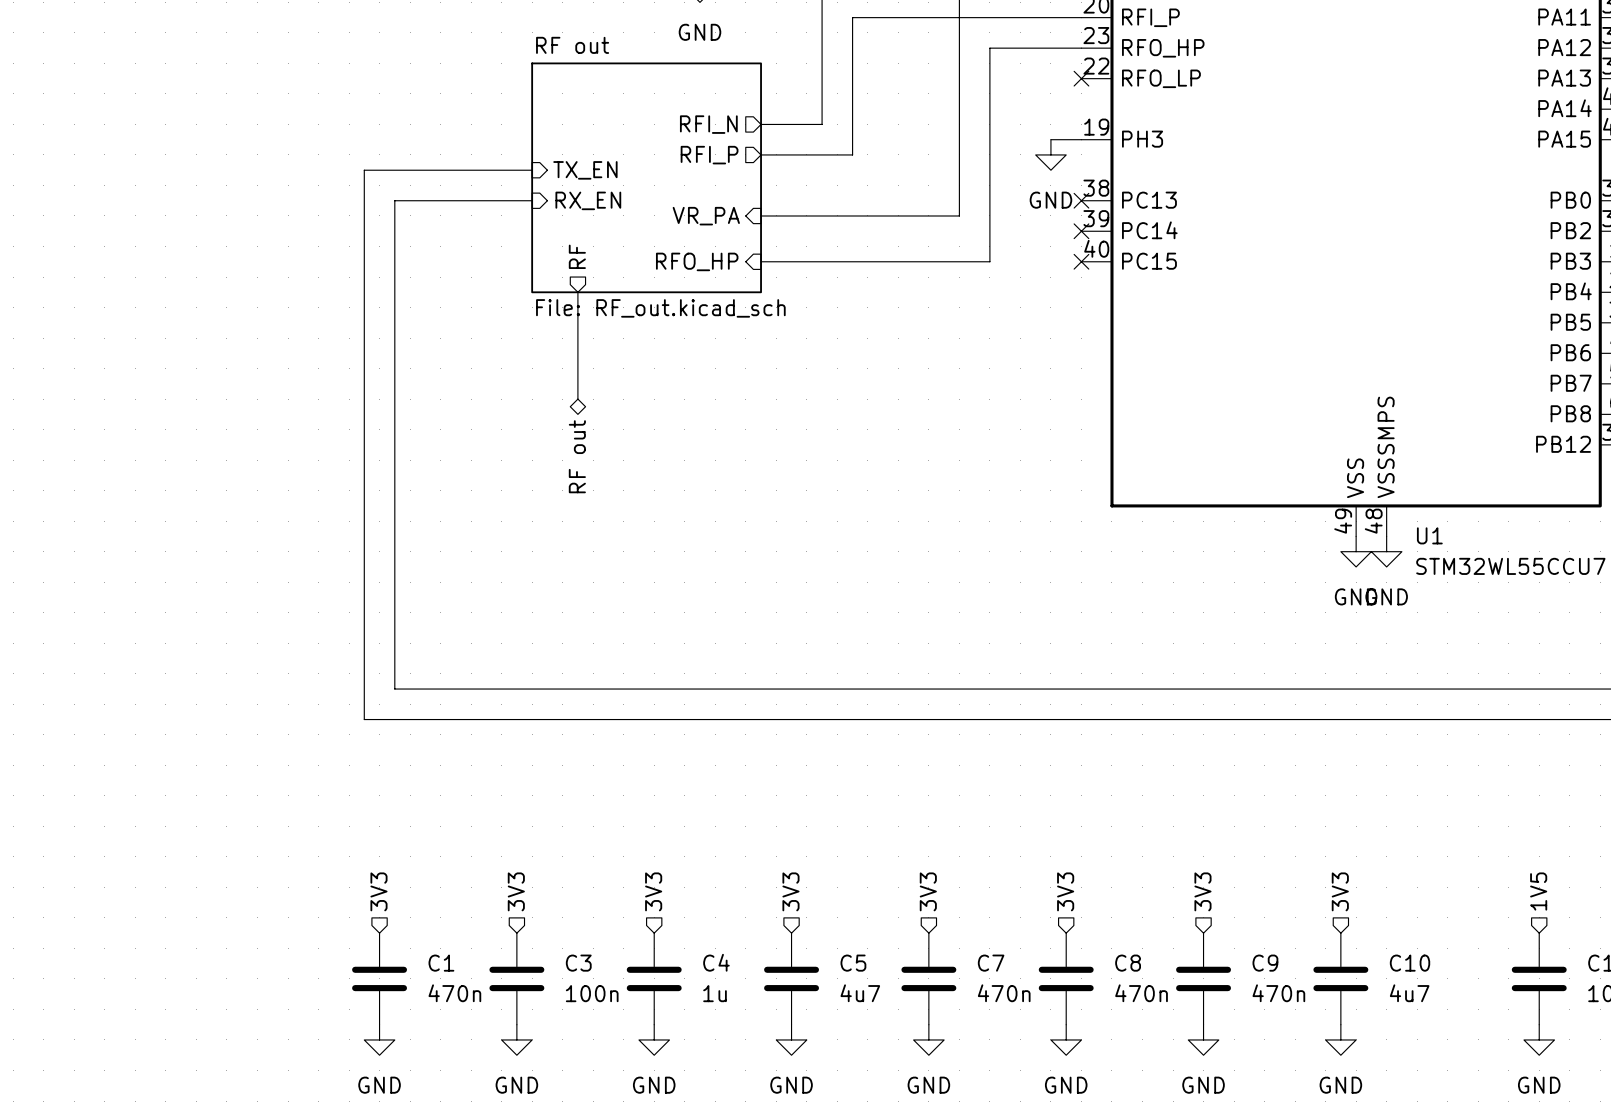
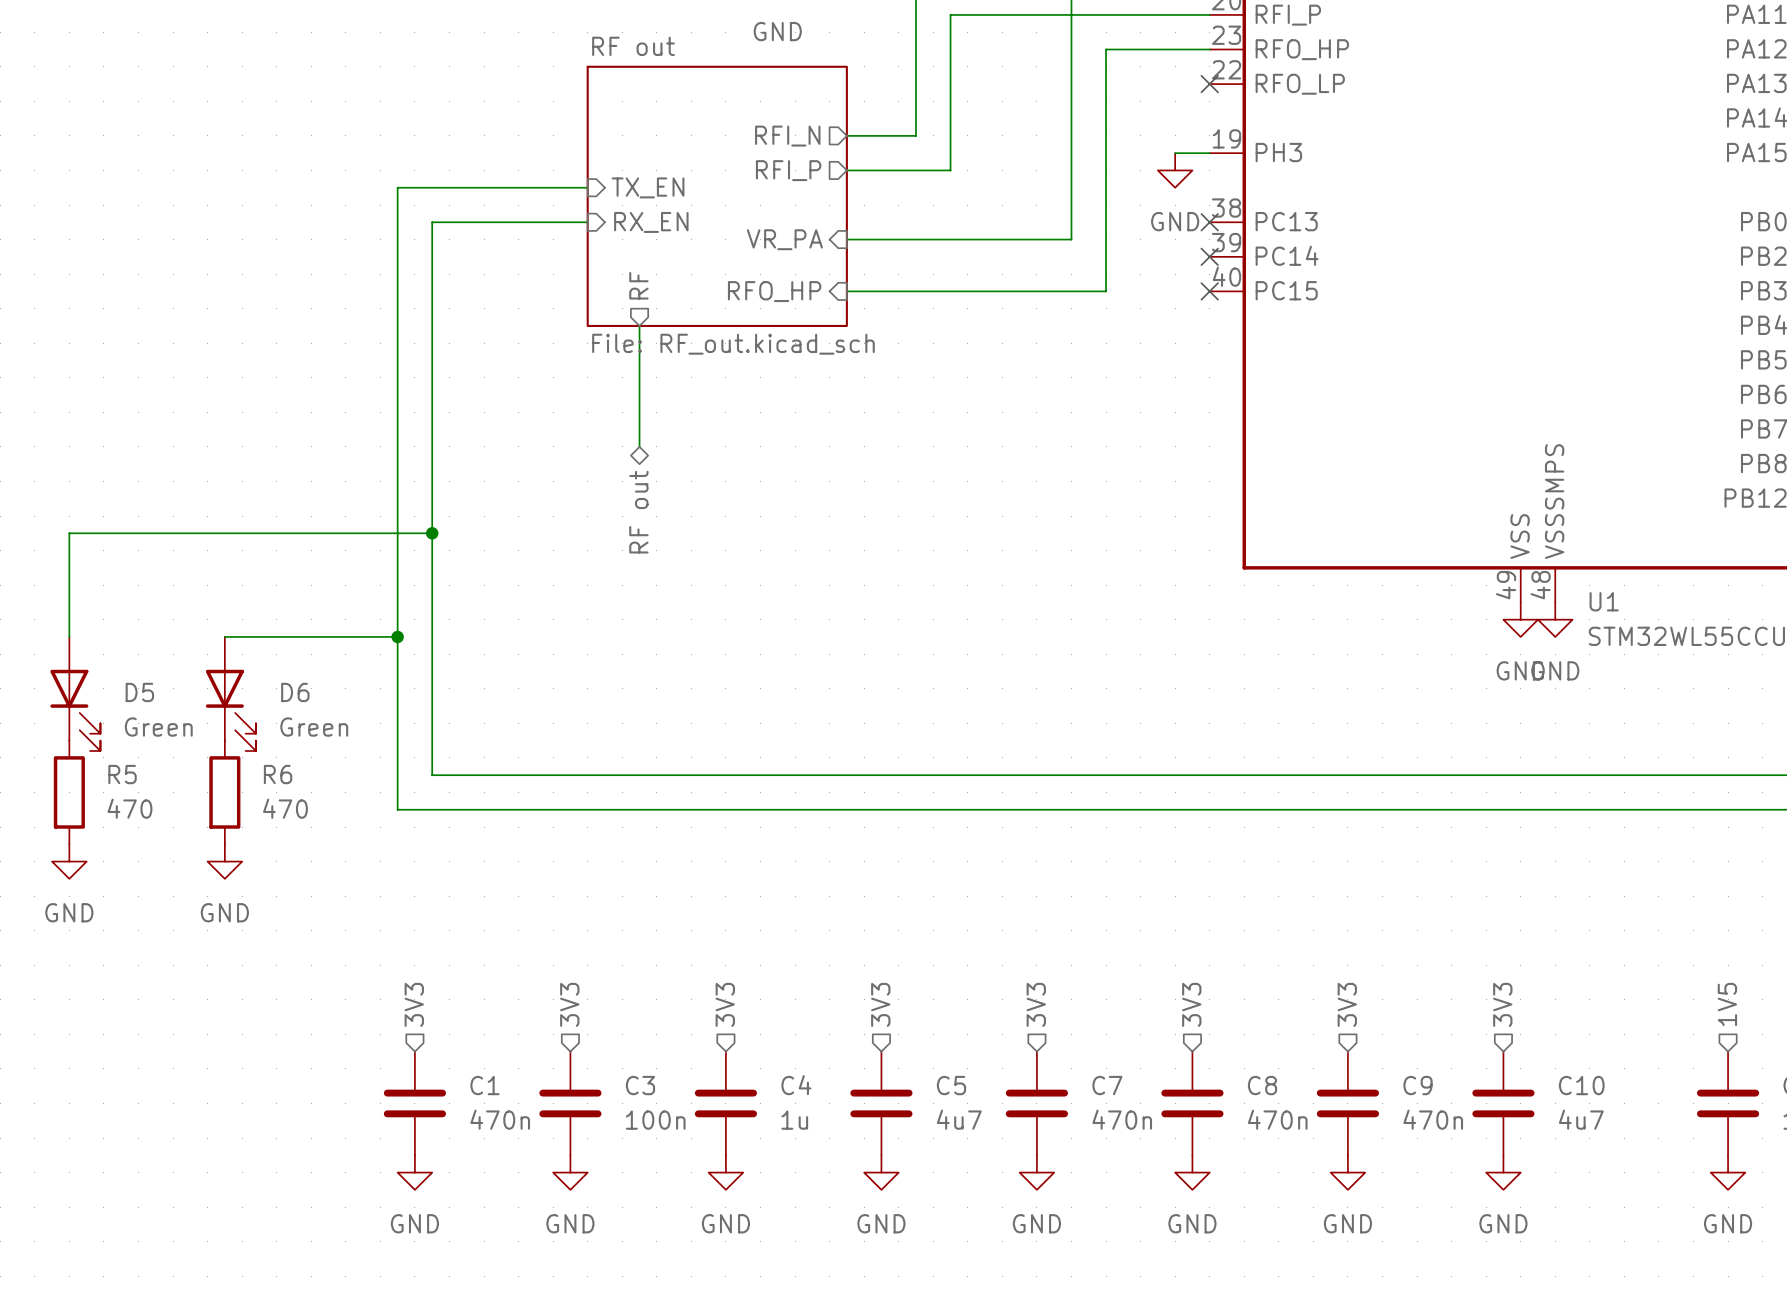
wire: none -> (432, 533) (69, 533) (69, 636)
junction: none -> (432, 533)
wire: none -> (224, 636) (397, 636)
junction: none -> (397, 636)
D5: none -> Green (75, 693)
D6: none -> Green (230, 693)
R5: none -> 470 (69, 792)
R6: none -> 470 (224, 792)
power symbol: none -> GND (69, 861)
power symbol: none -> GND (224, 861)

